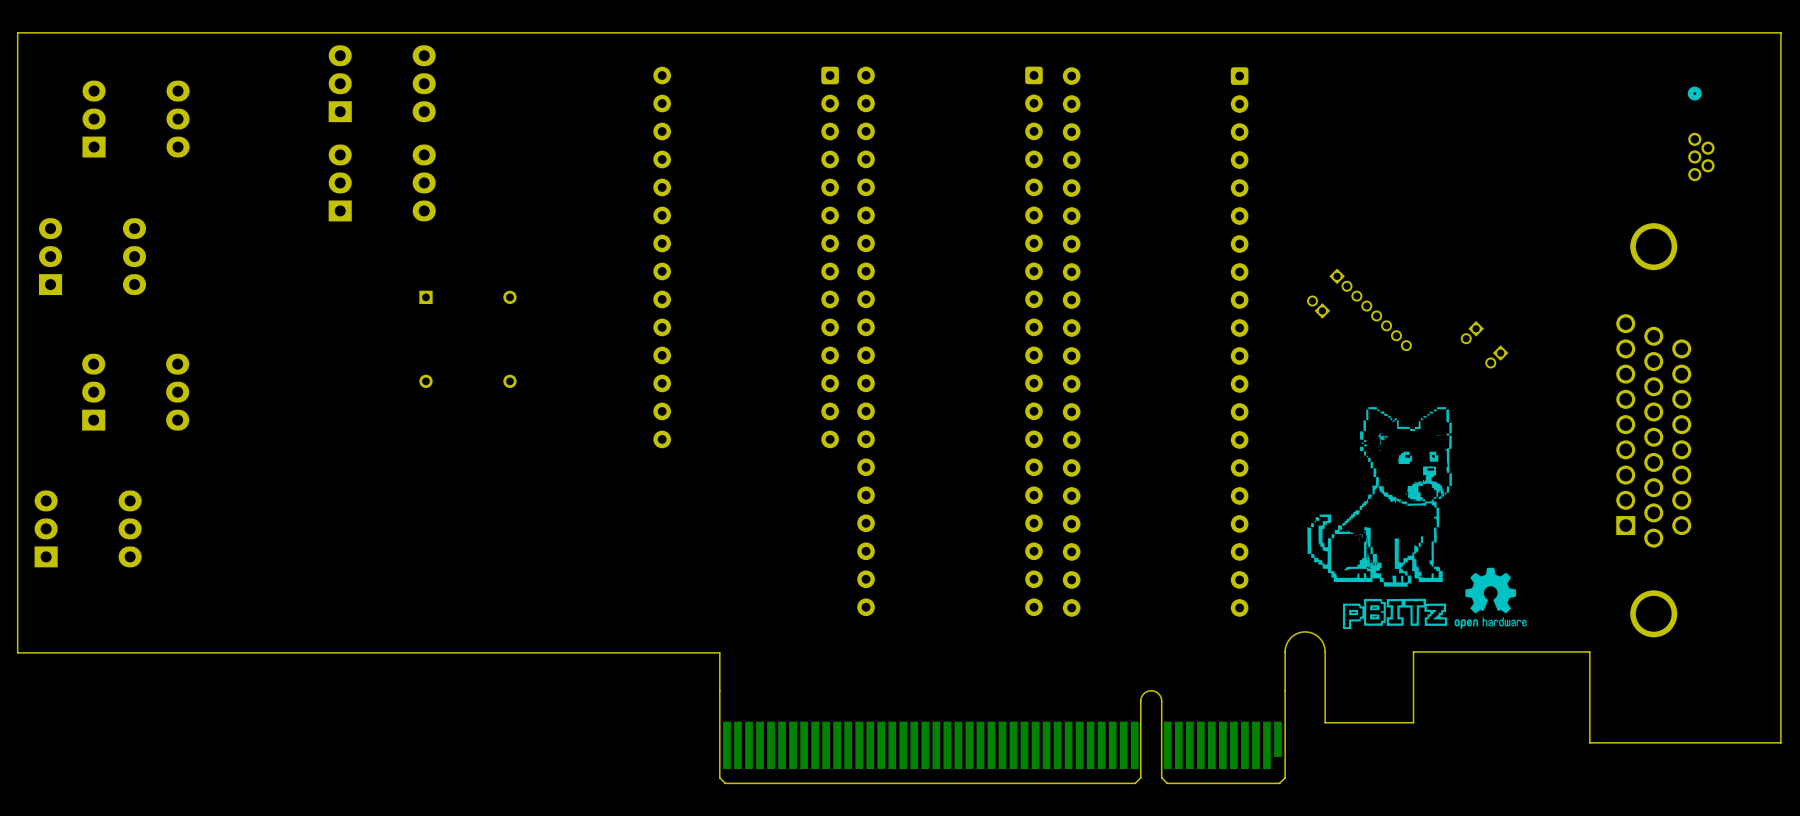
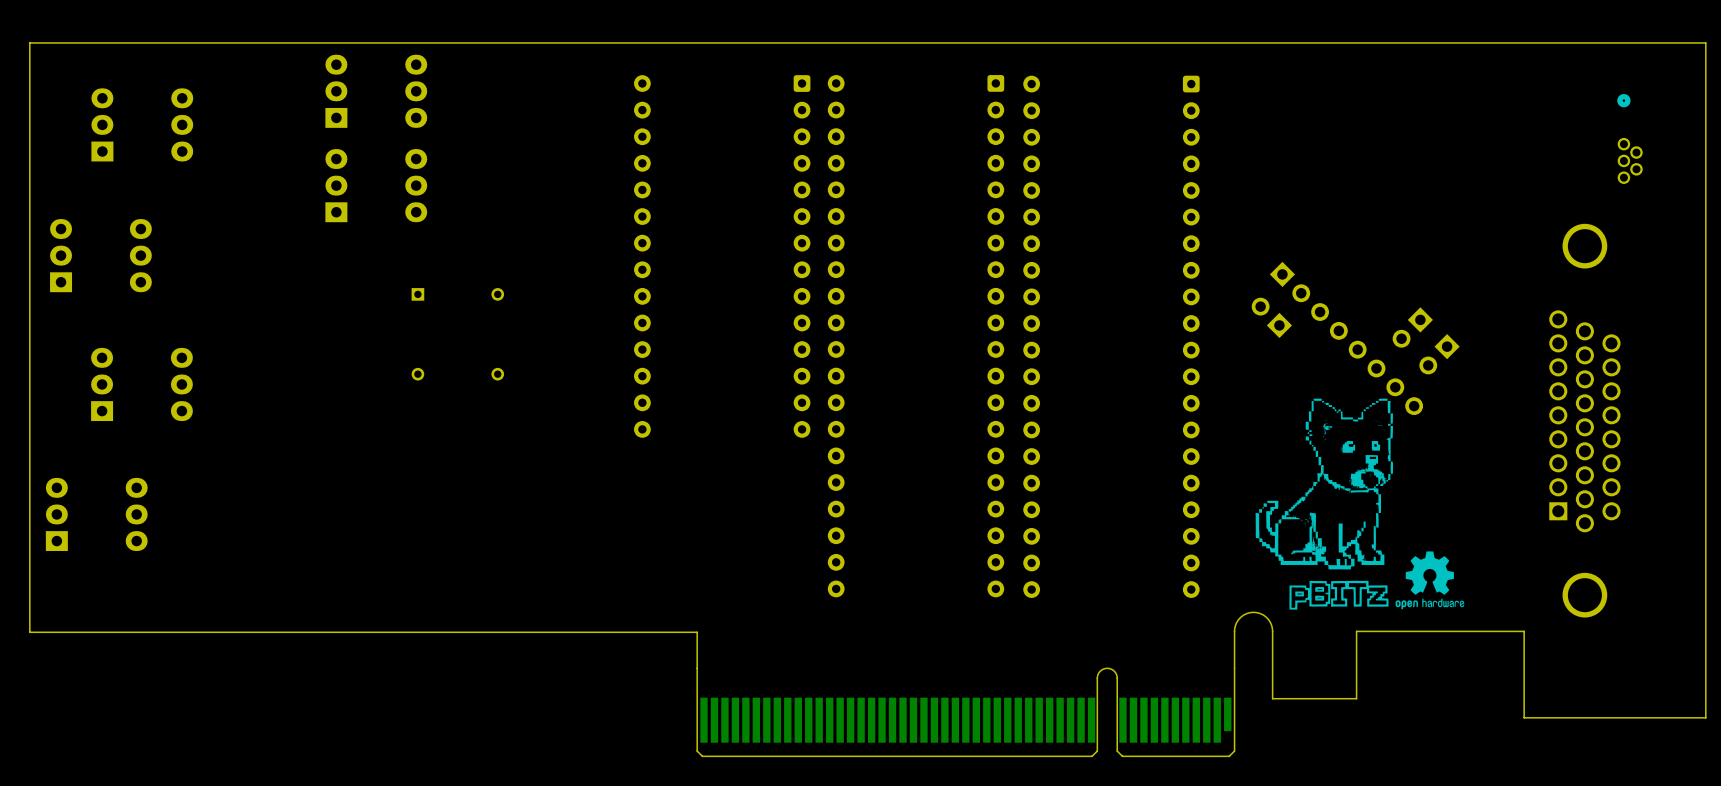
part: (1318, 307) -> none
part: (1370, 309) -> none
part footprint: [1460, 320, 1484, 345] -> [1392, 307, 1433, 348]
part: none -> (1271, 317)
part: none -> (1346, 338)
part footprint: [1485, 345, 1509, 369] -> [1419, 334, 1460, 375]

